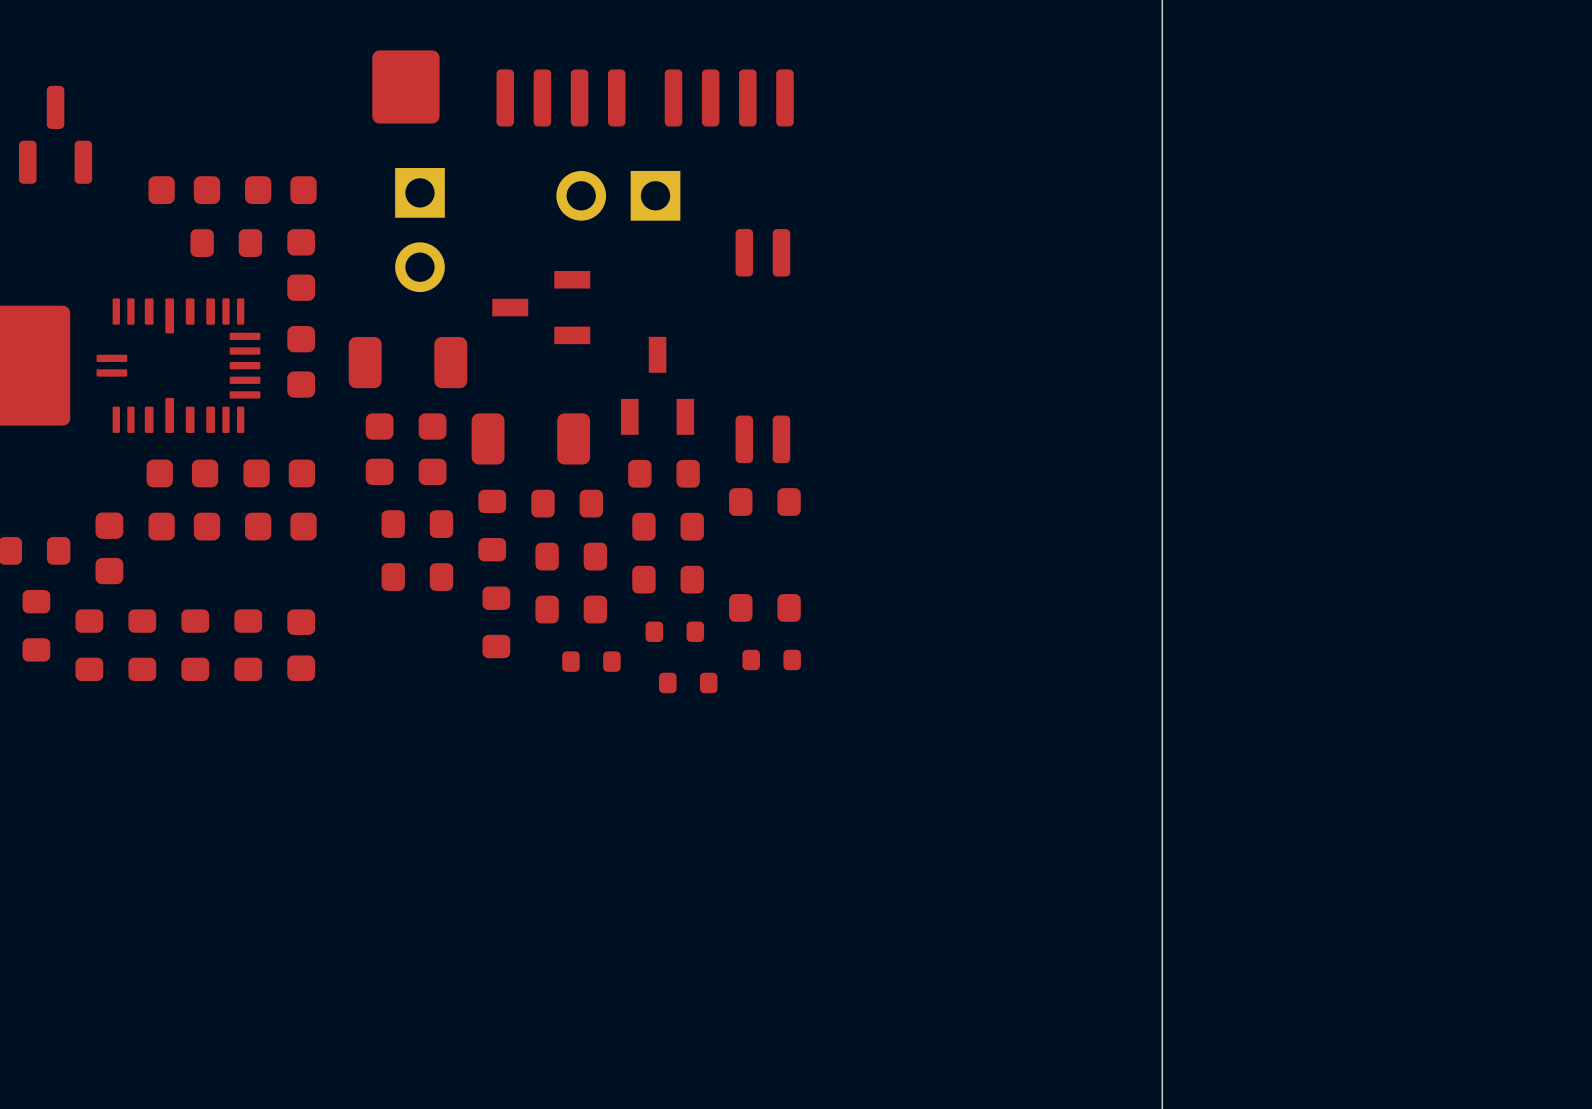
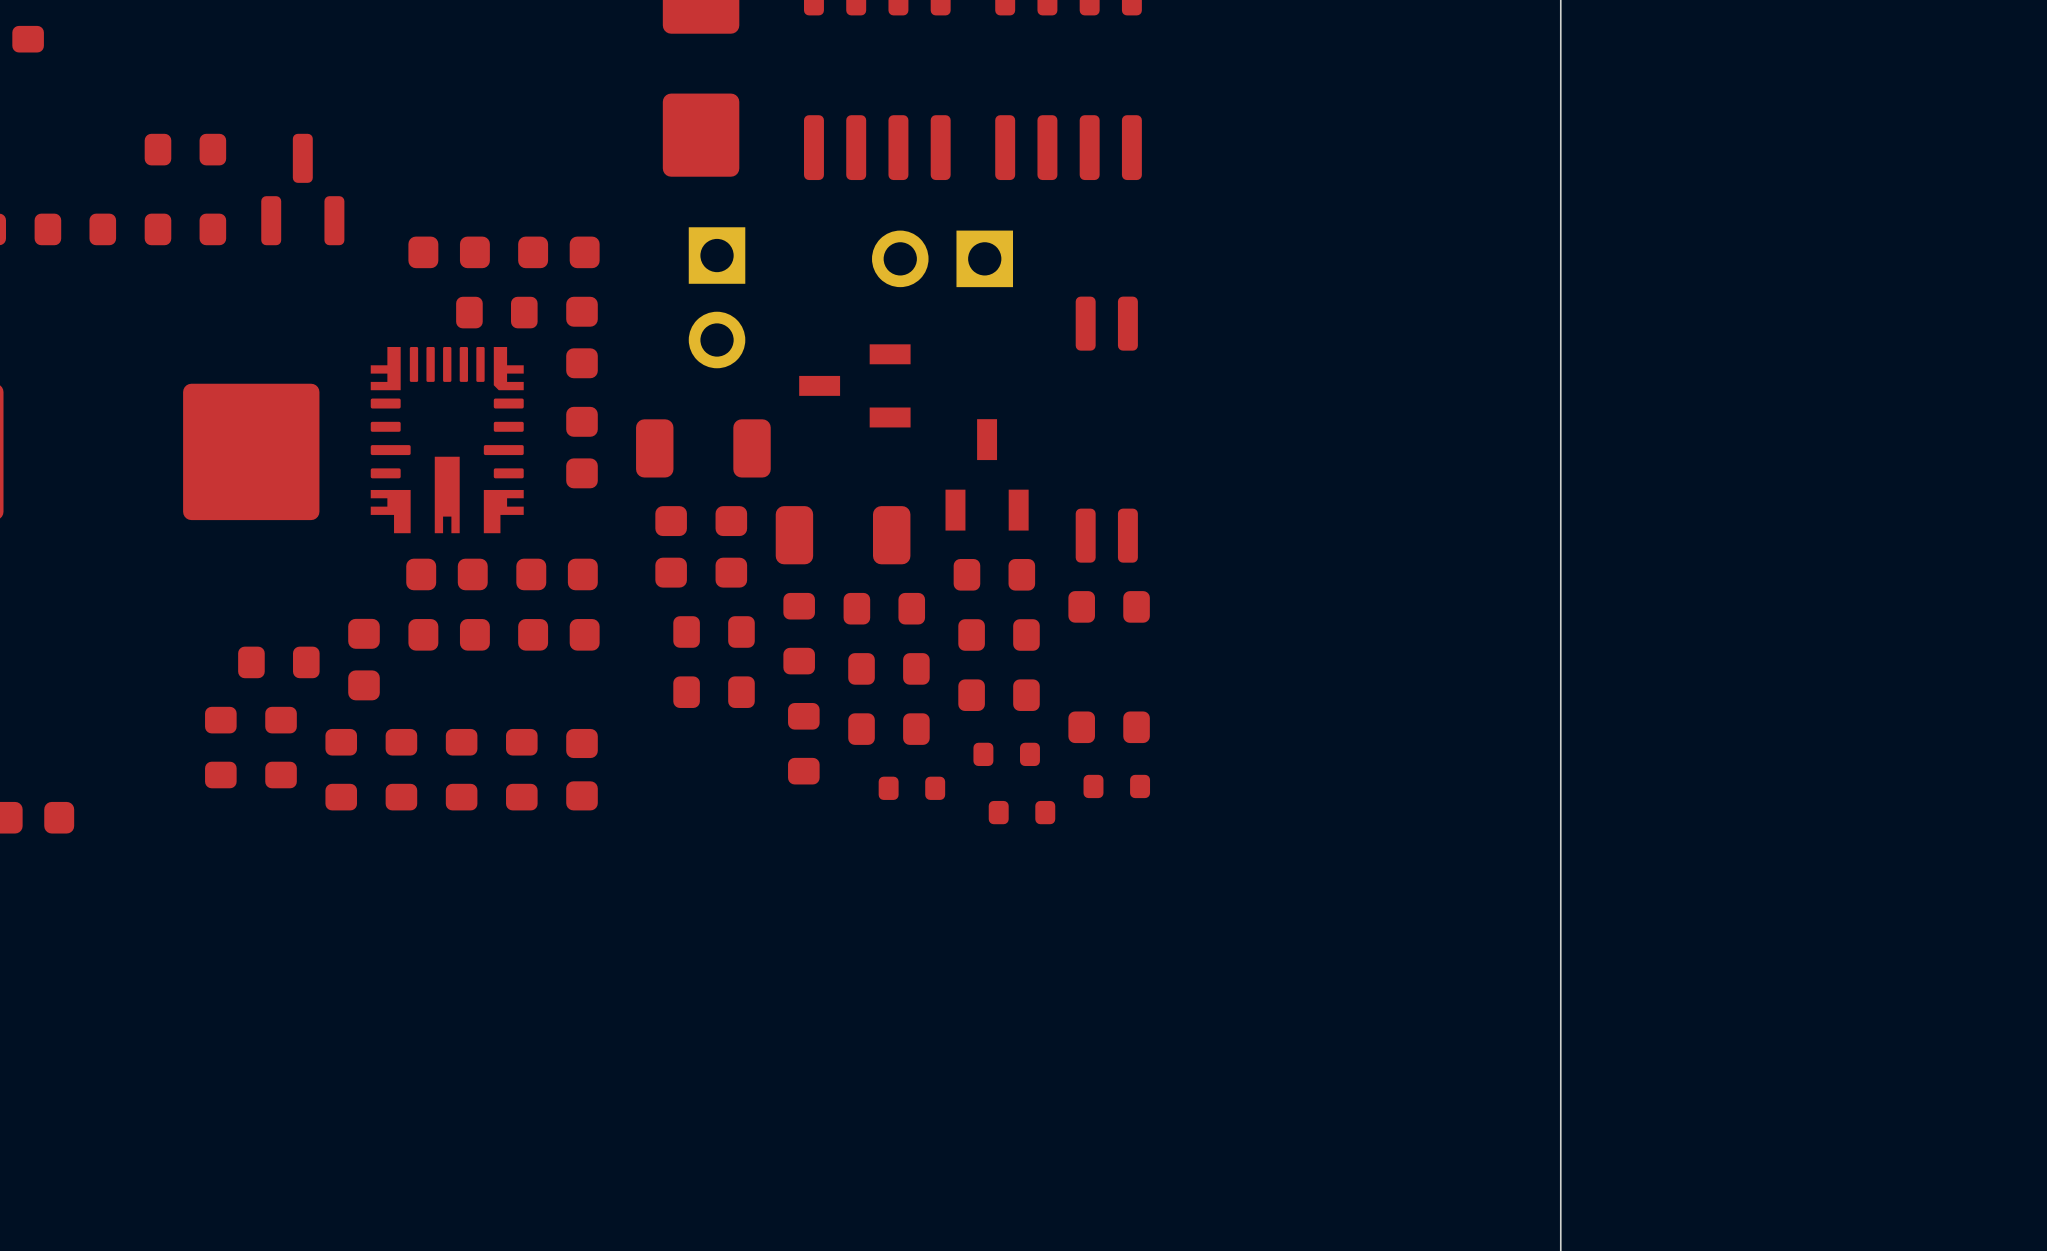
part footprint: [96, 298, 261, 433] -> [370, 346, 524, 534]

